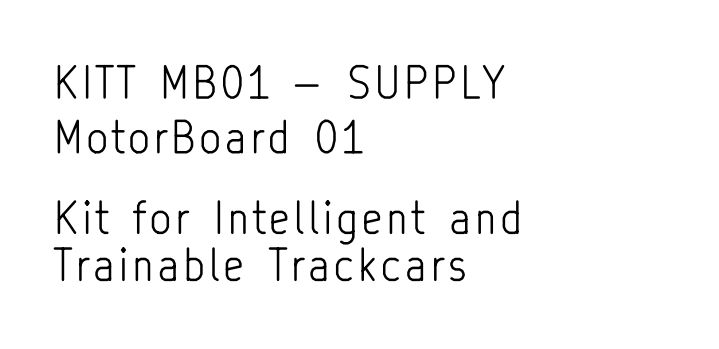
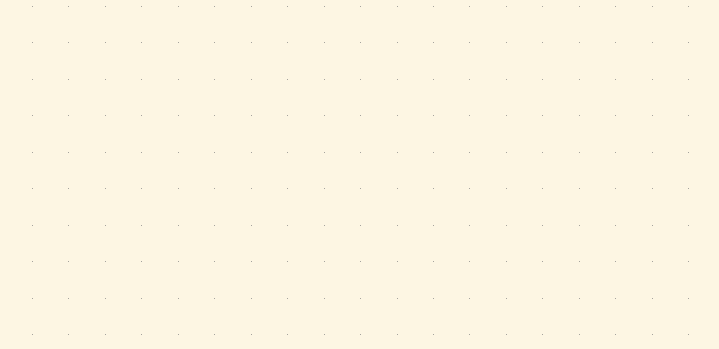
text: KITT MB01 (163, 81) -> none
text: - SUPPLY (399, 81) -> none
text: MotorBoard 01 (210, 136) -> none
text: Kit for Intelligent and (288, 222) -> none
text: Trainable Trackcars (259, 264) -> none

